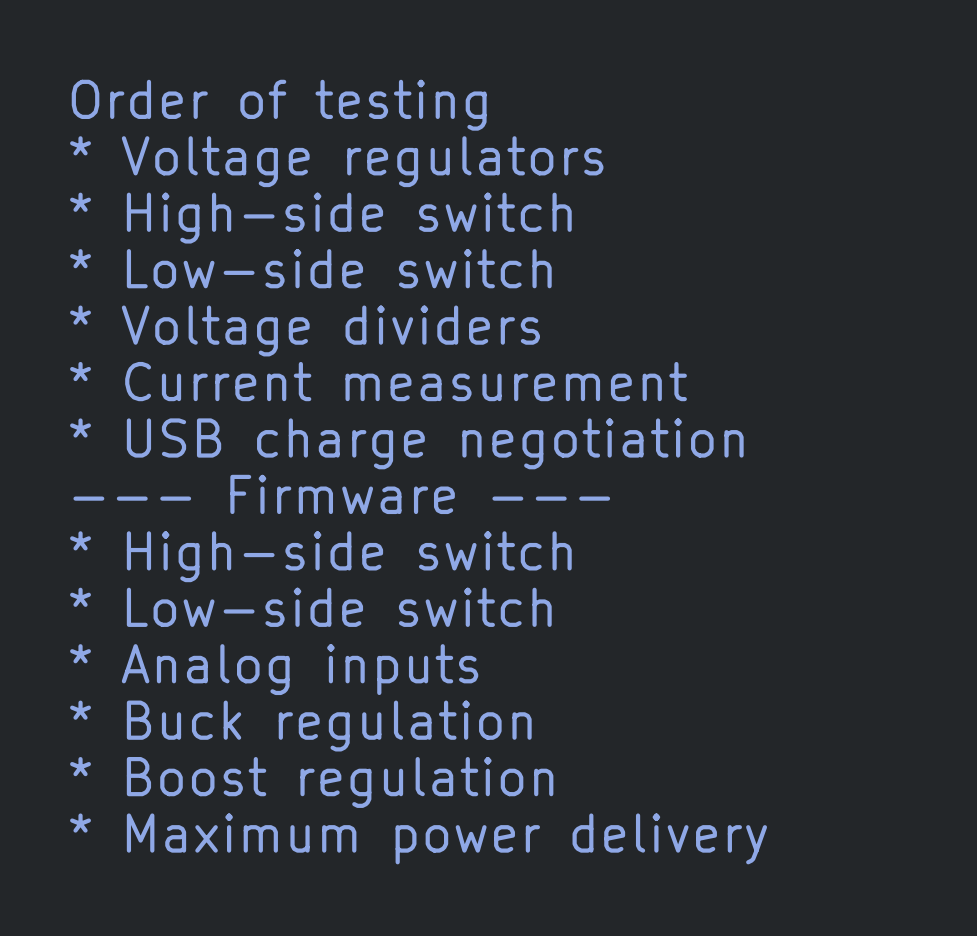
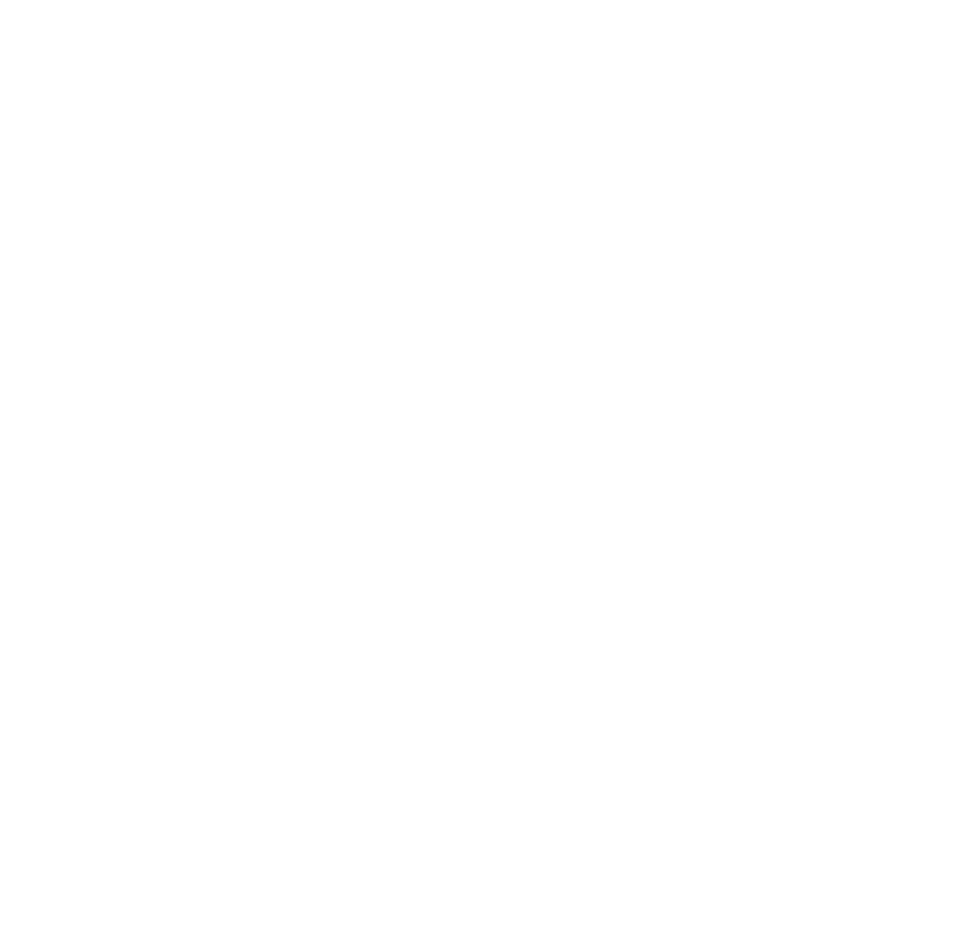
text: Order of testing (279, 105) -> none
text: * Voltage regulators (336, 161) -> none
text: * High-side switch (320, 218) -> none
text: * Low-side switch (310, 268) -> none
text: * Voltage dividers (305, 330) -> none
text: * Current measurement (378, 381) -> none
text: * USB charge negotiation (406, 443) -> none
text: --- Firmware --- (341, 494) -> none
text: * High-side switch (320, 556) -> none
text: * Low-side switch (310, 607) -> none
text: * Analog inputs (274, 669) -> none
text: * Buck regulation (300, 726) -> none
text: * Boost regulation (311, 782) -> none
text: * Maximum power delivery (418, 838) -> none

